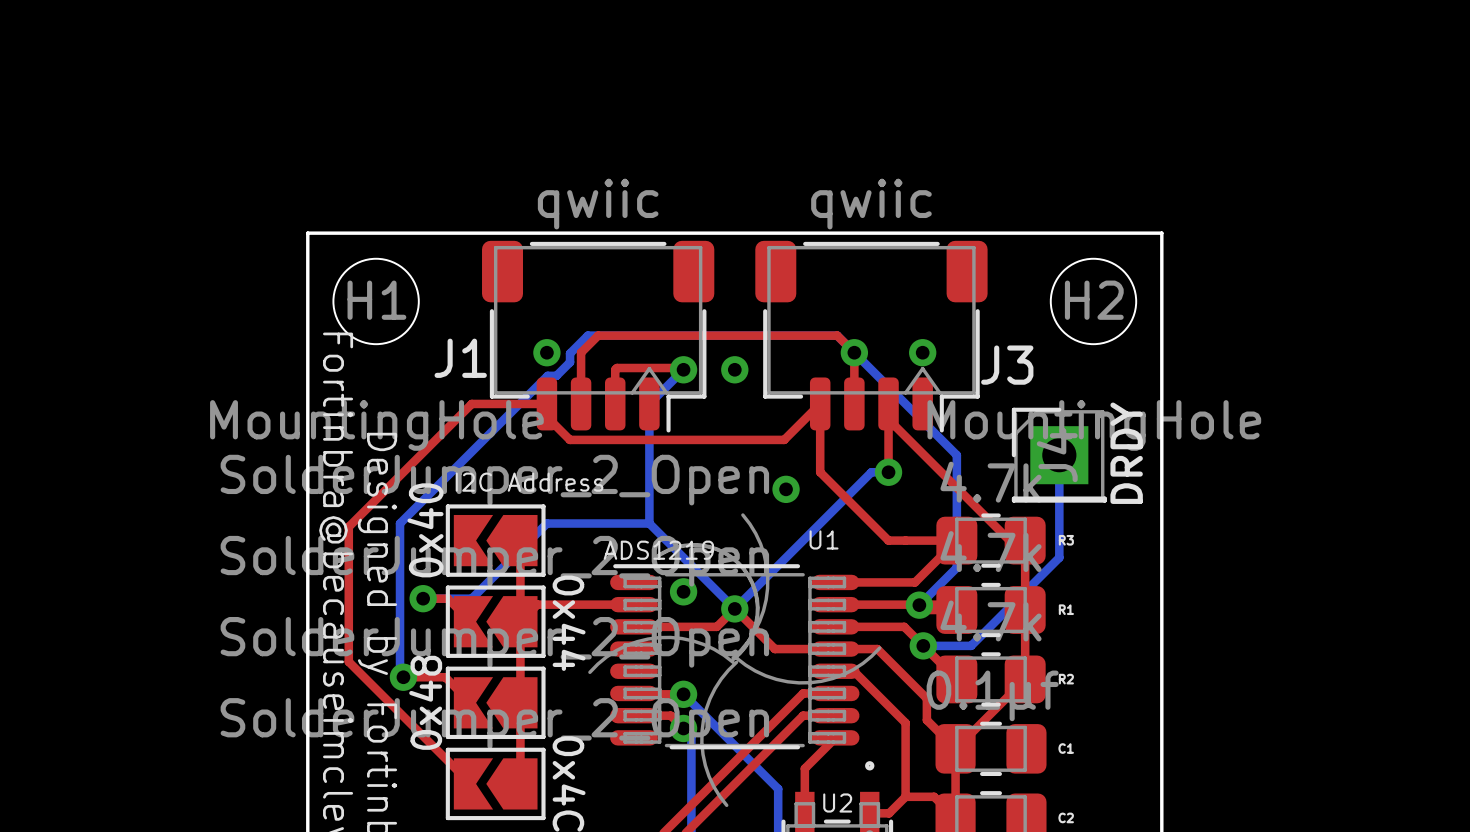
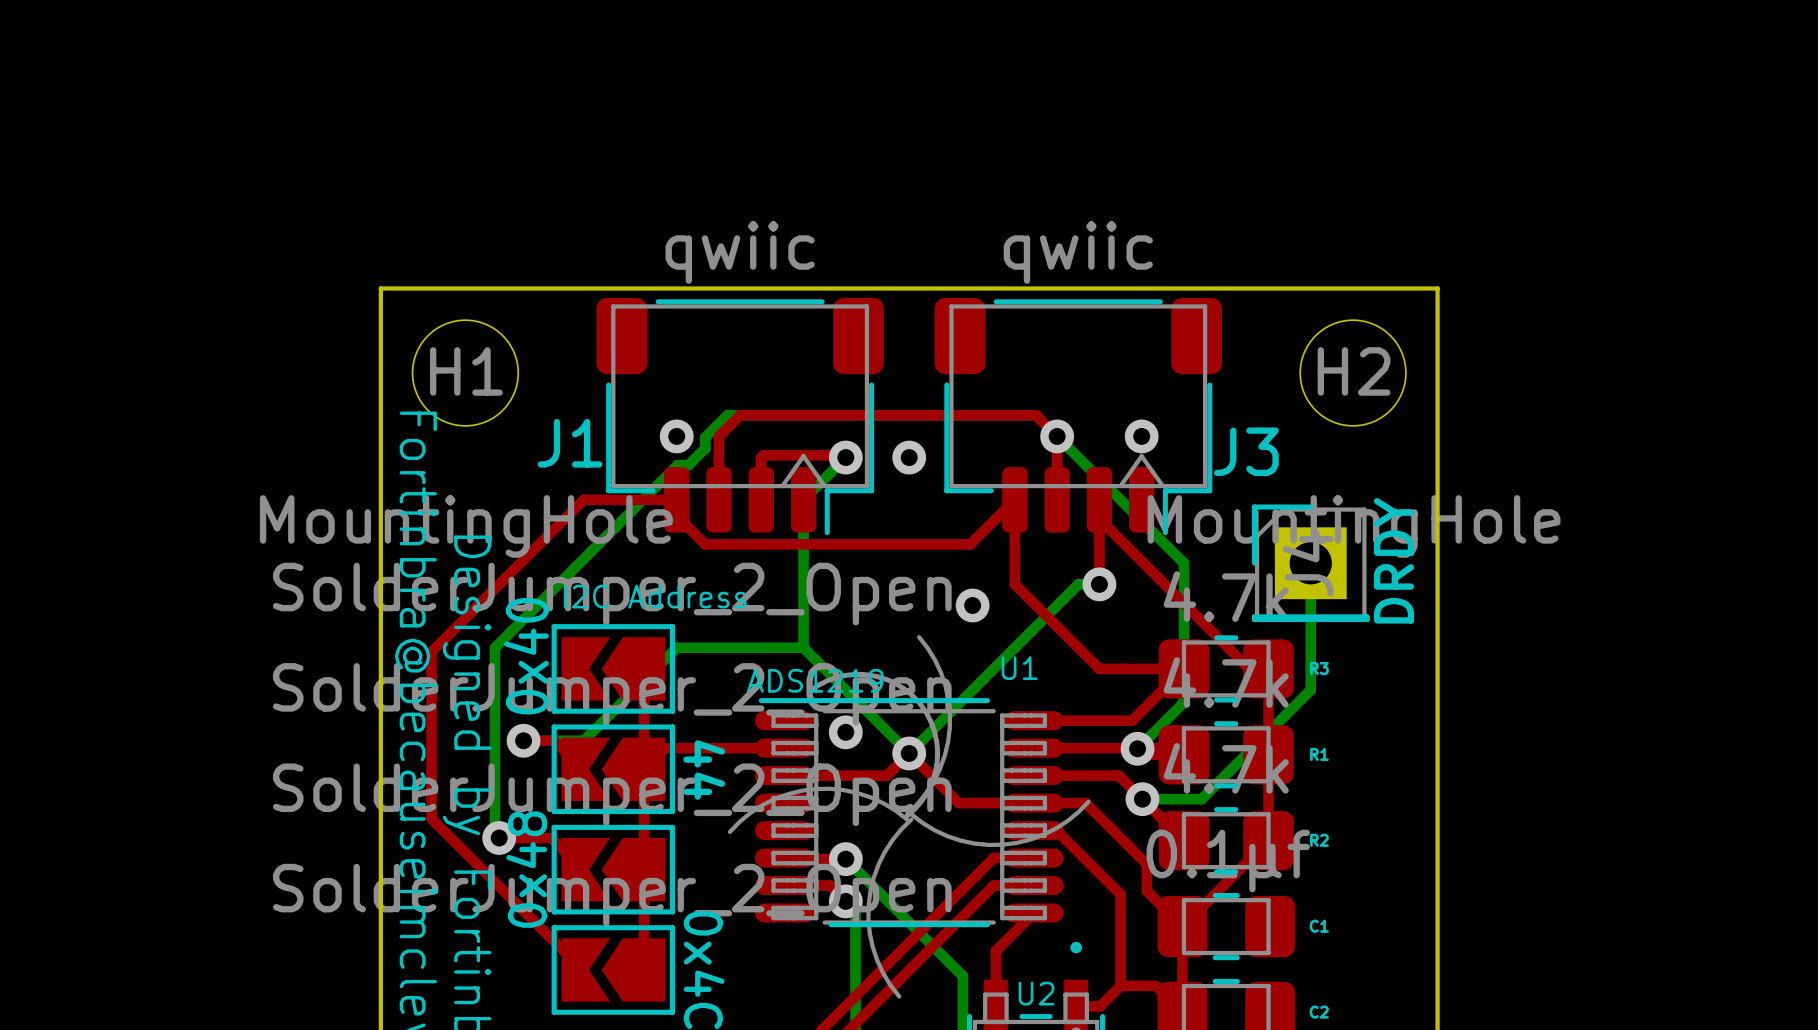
part text: none -> 44 (704, 770)
part text: 0x44 (569, 623) -> none

